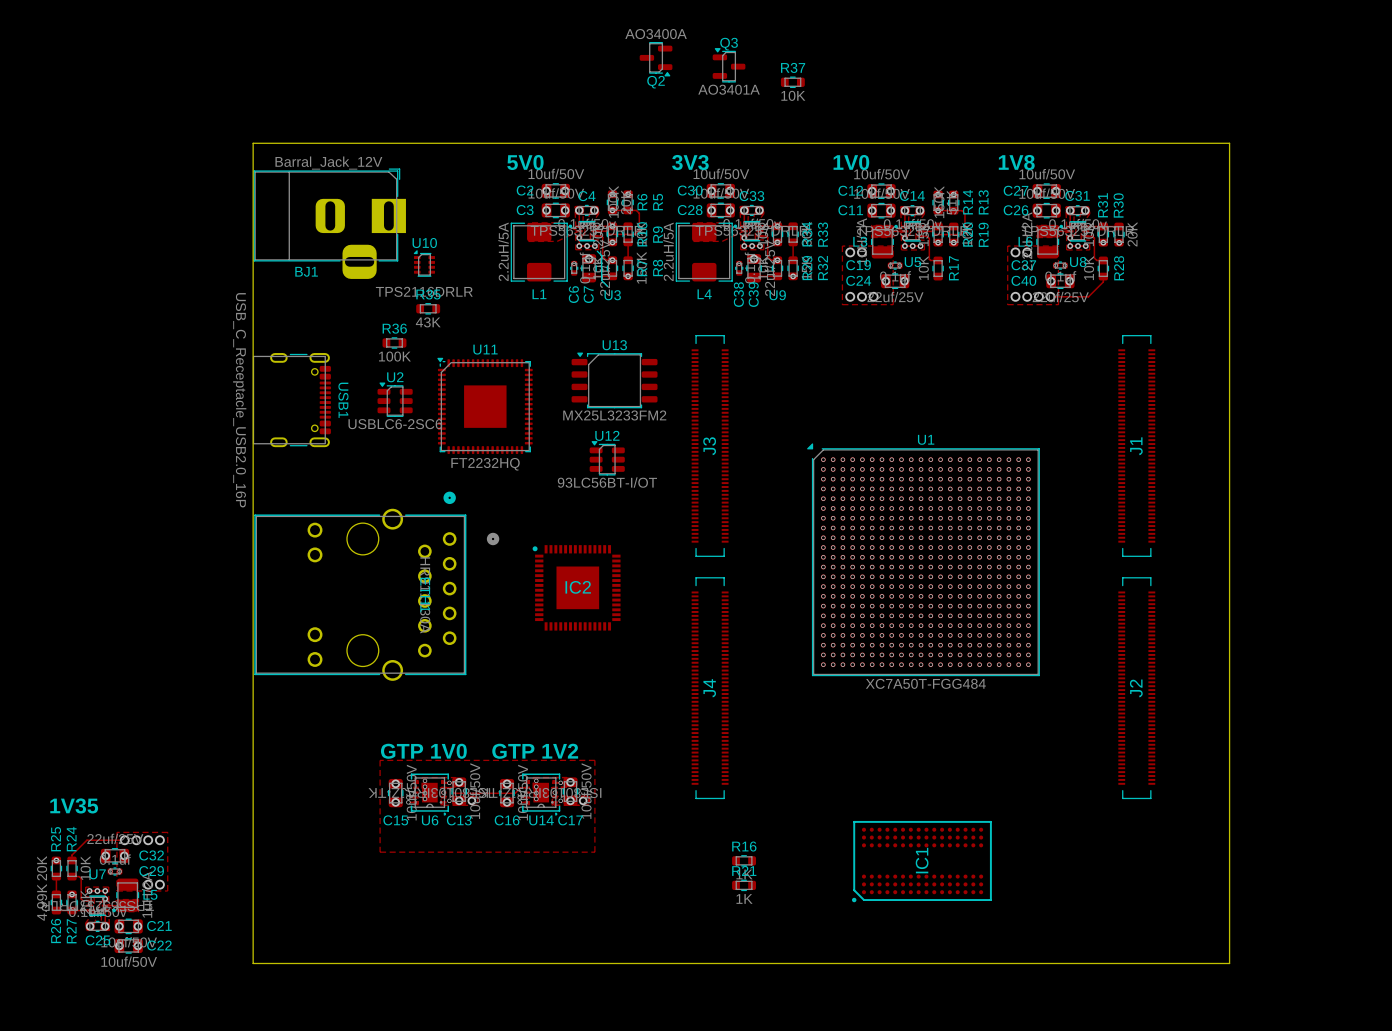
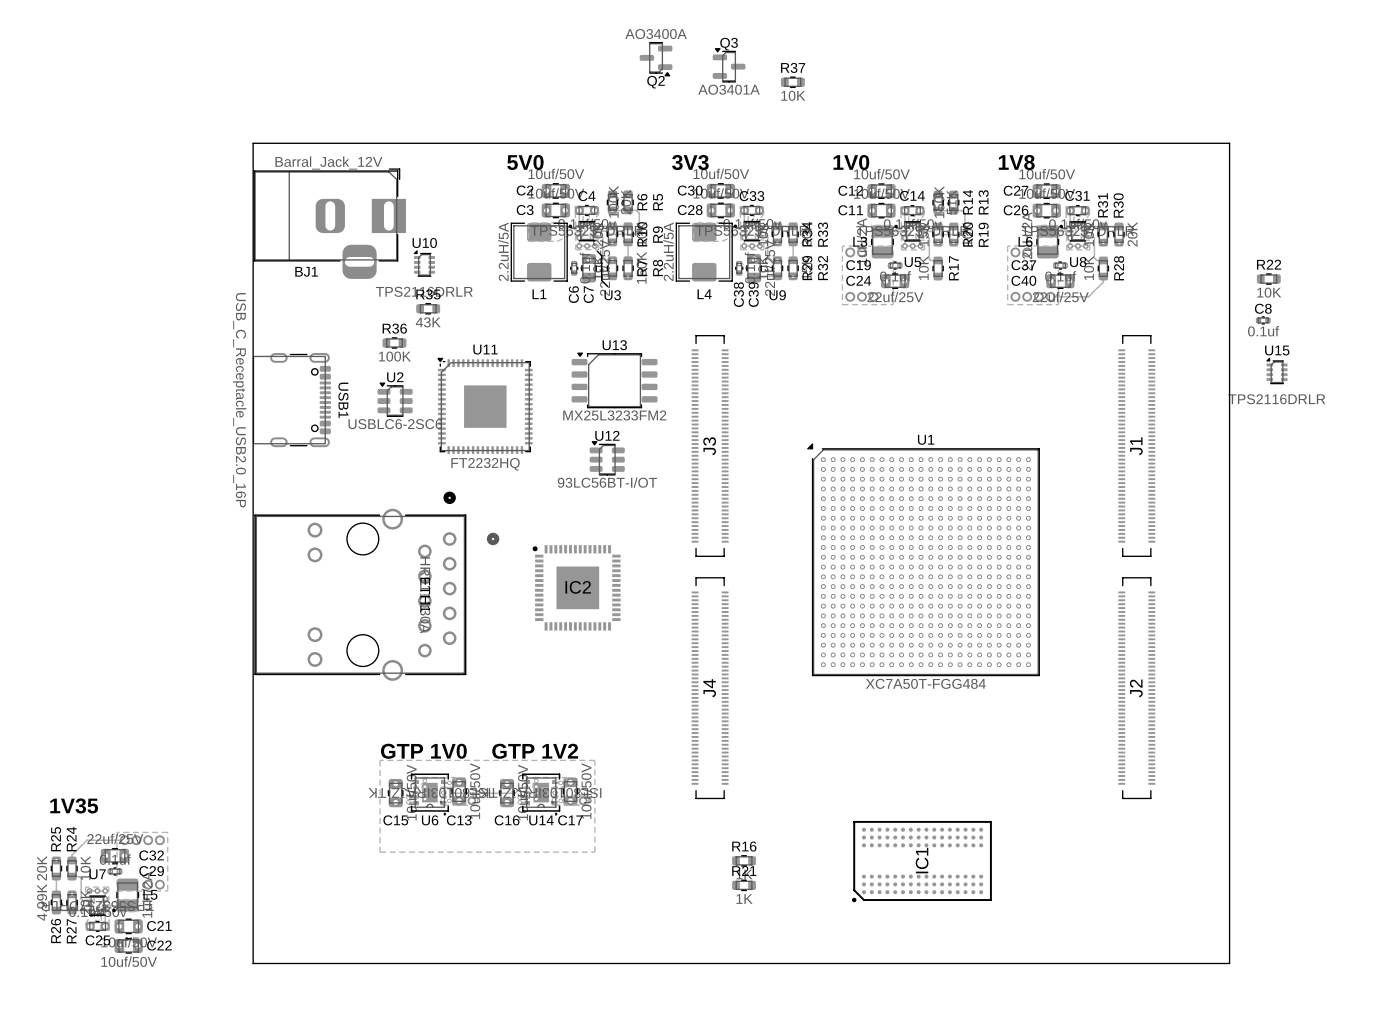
R22: none -> 10K (1268, 279)
C8: none -> 0.1uf (1263, 320)
U15: none -> TPS2116DRLR (1276, 370)

